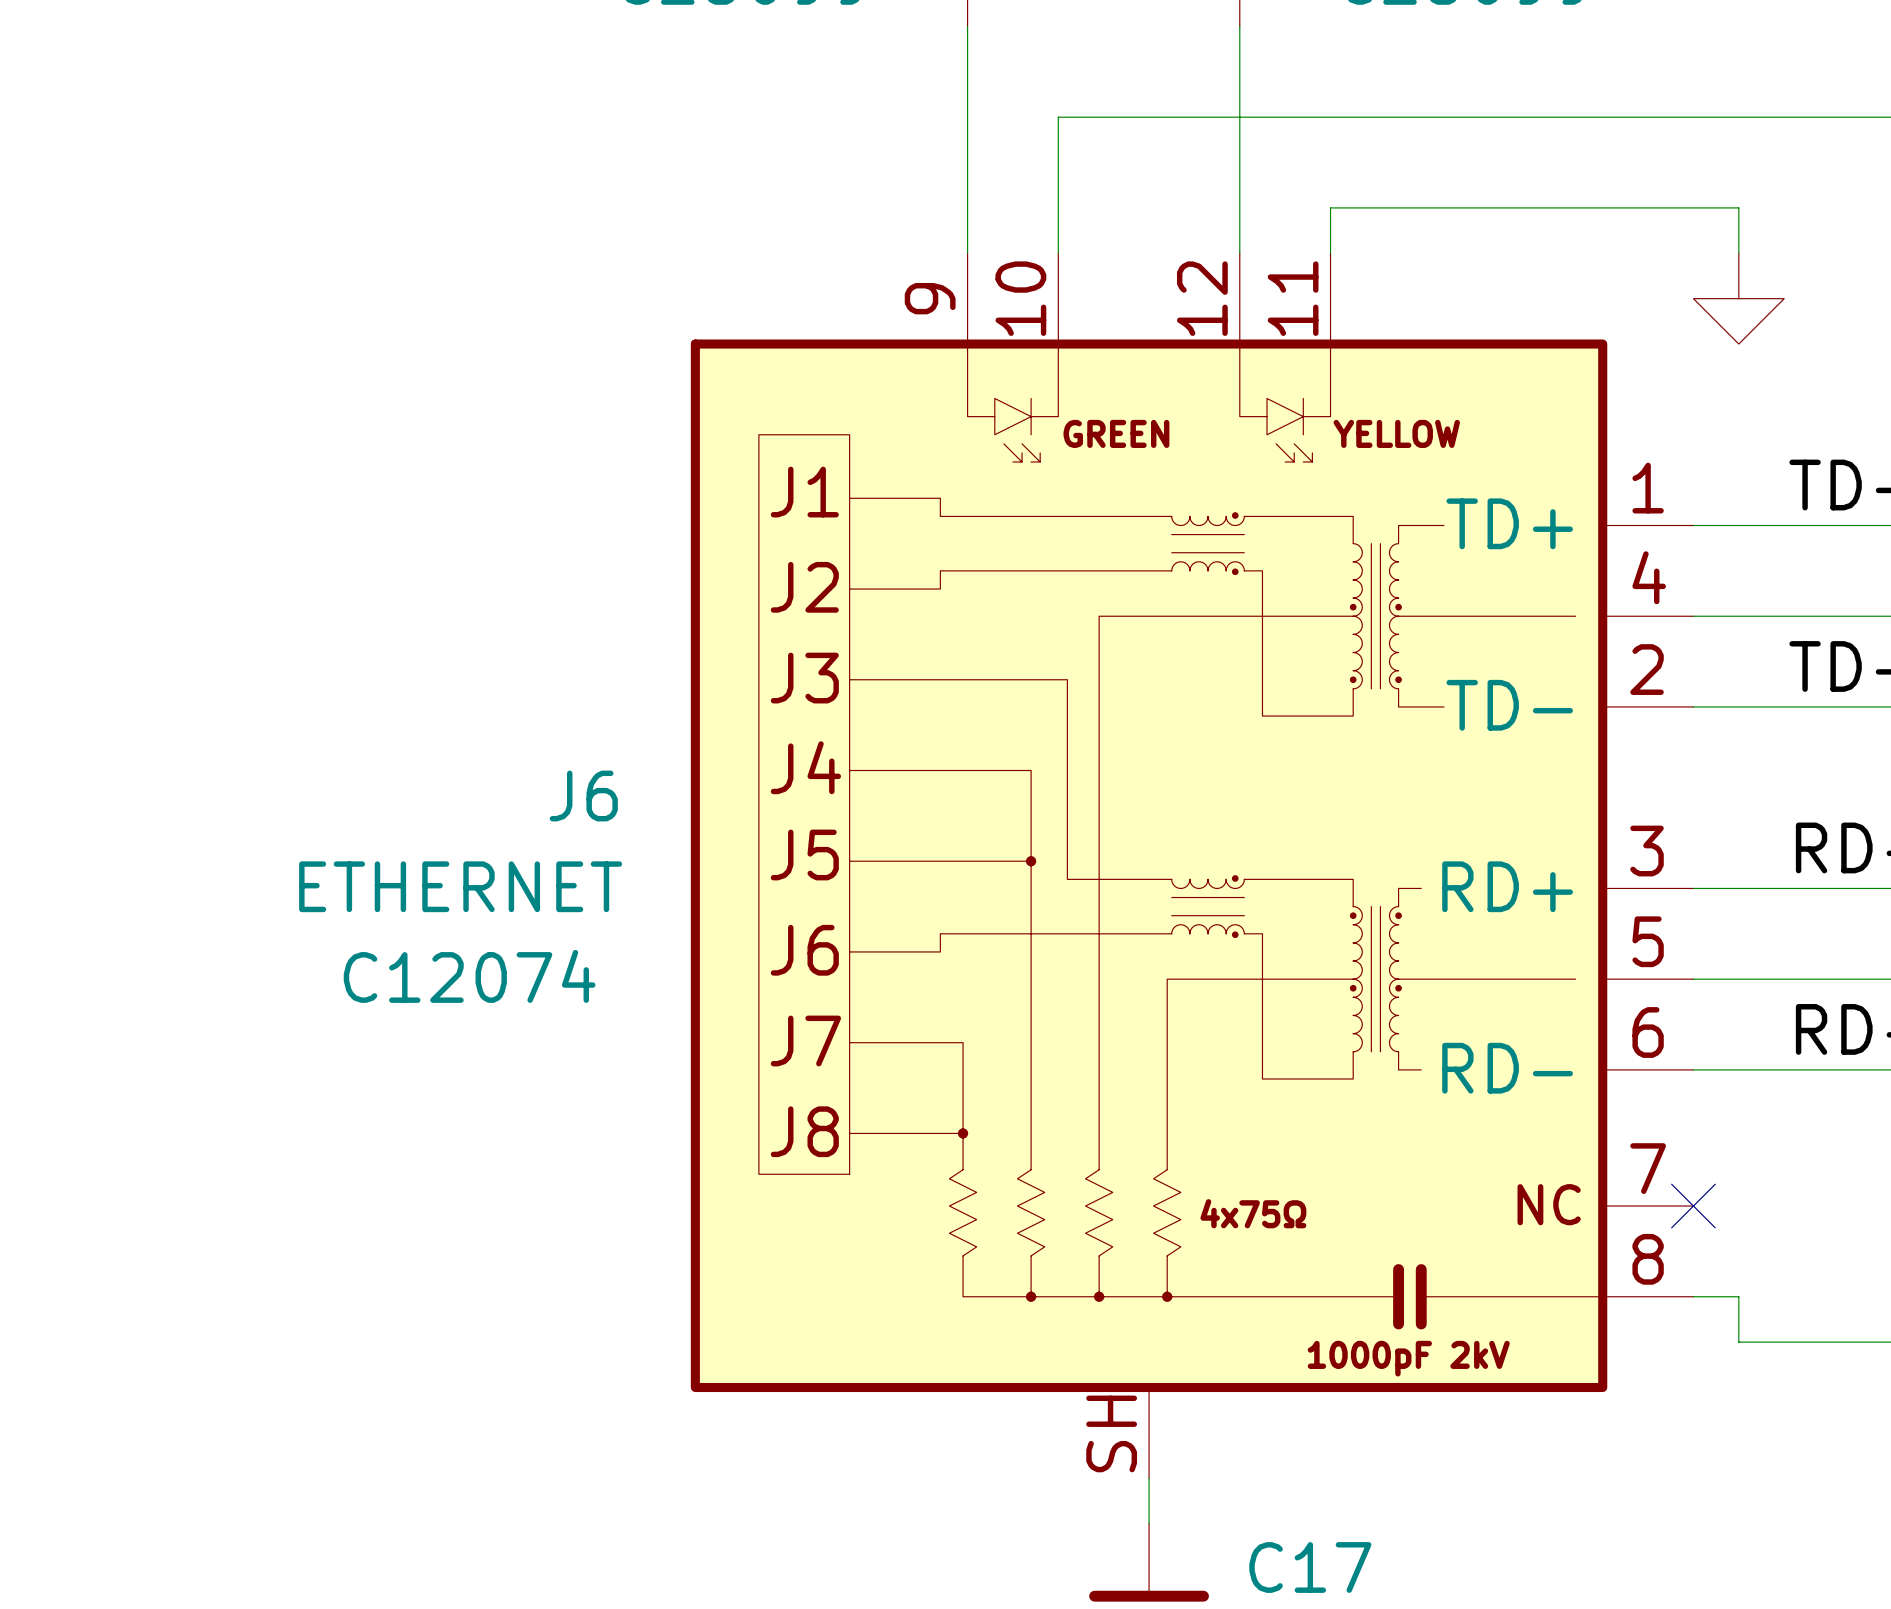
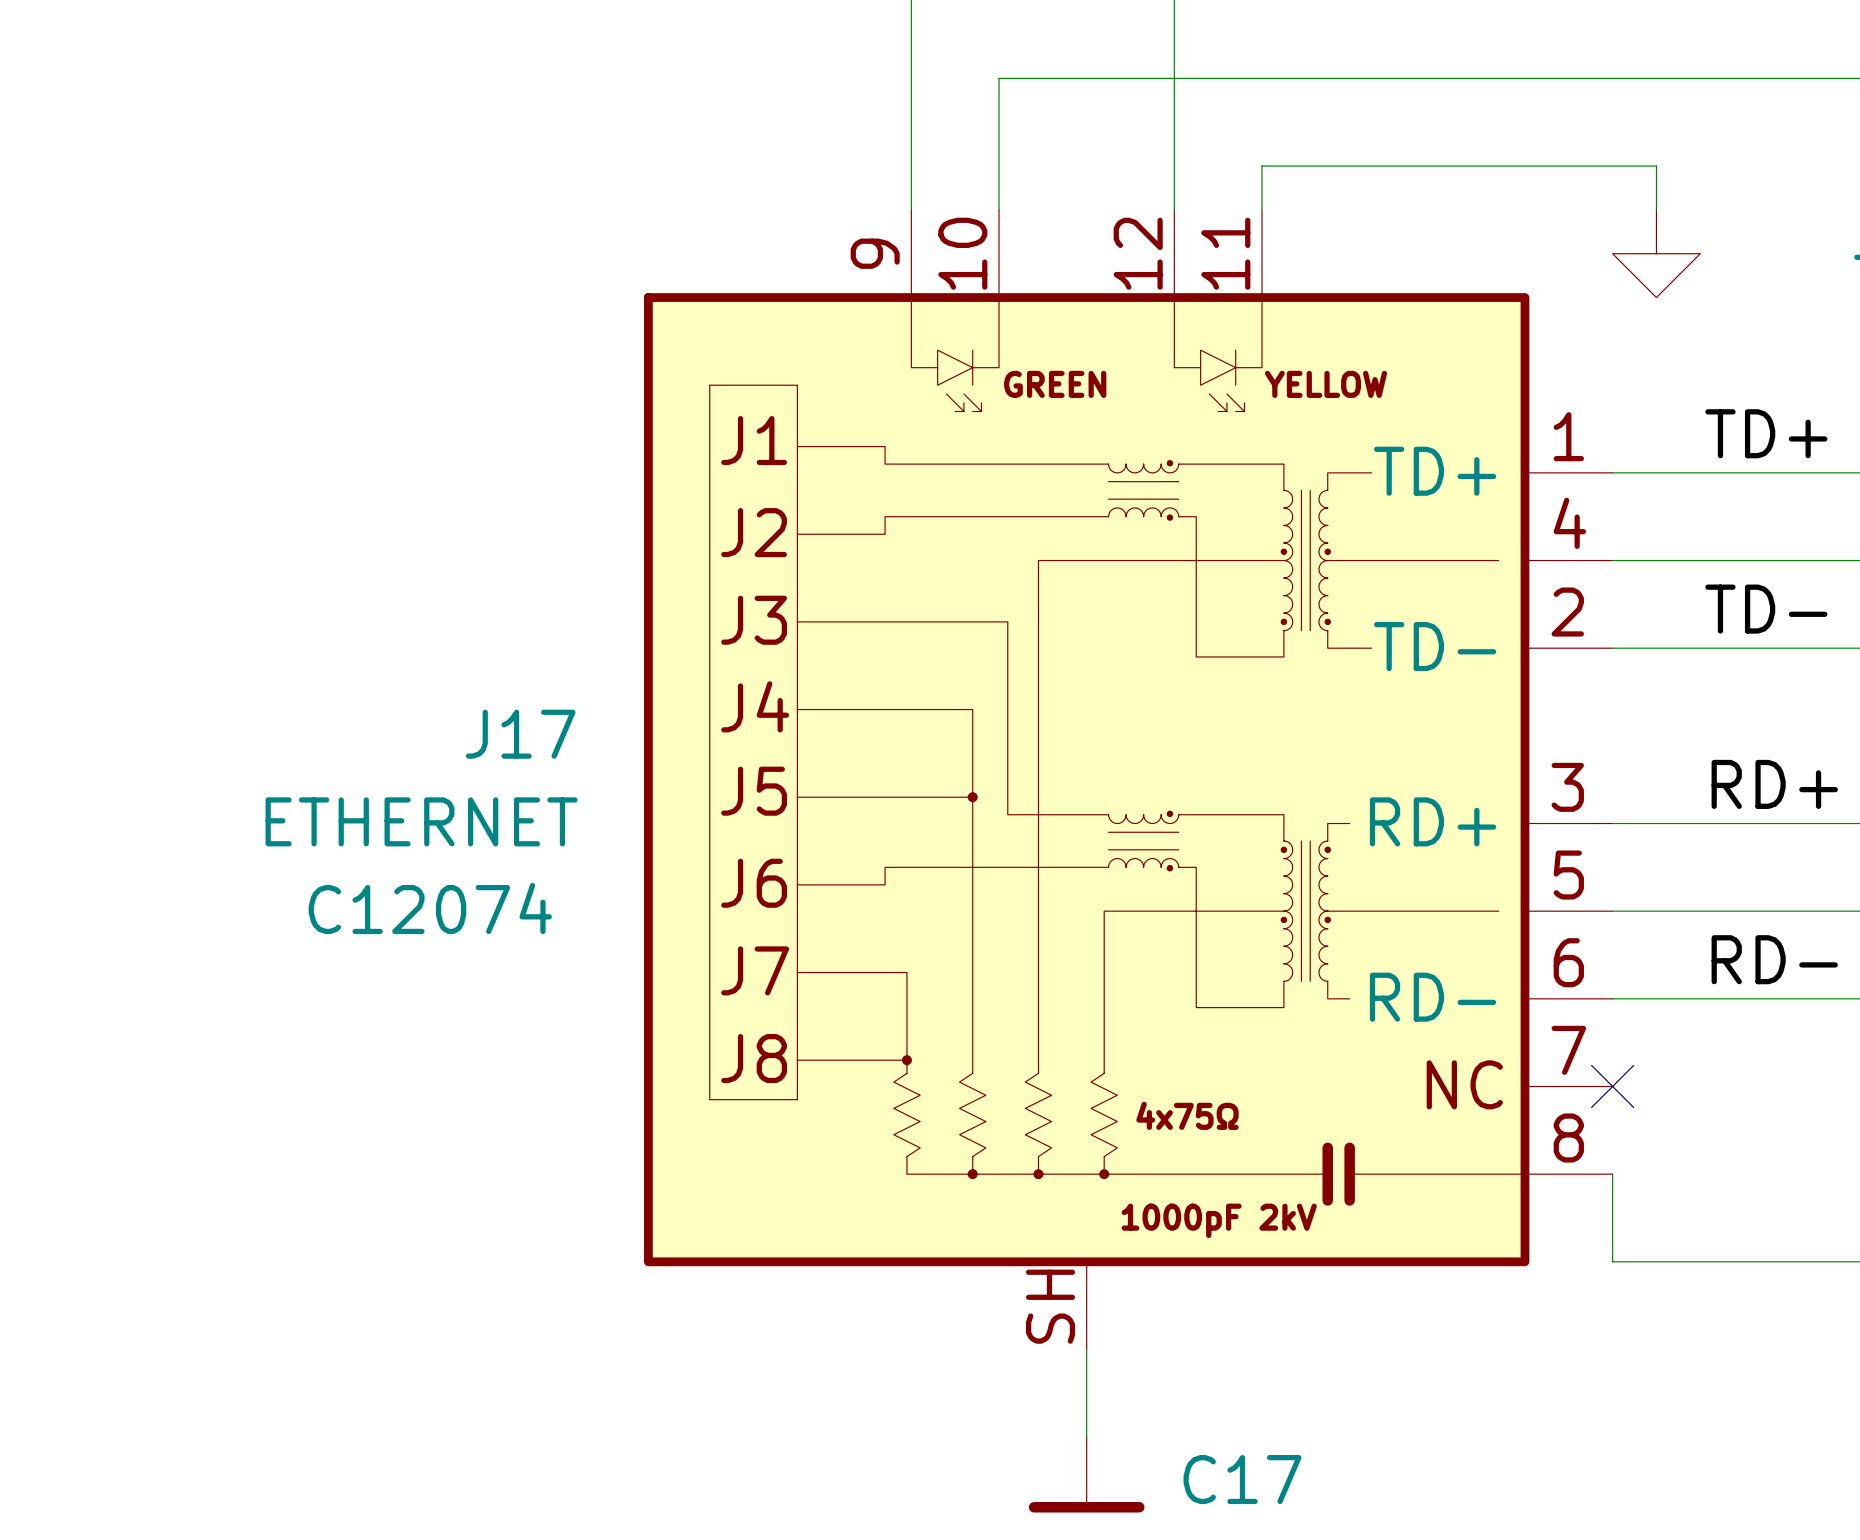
J17: none -> ETHERNET (1128, 779)
J6: ETHERNET (1192, 865) -> none
no-connect mark position: (1693, 1206) -> (1612, 1086)
wire: (1693, 1296) (1738, 1296) (1738, 1342) -> (1612, 1174) (1612, 1261) (1656, 1261)

